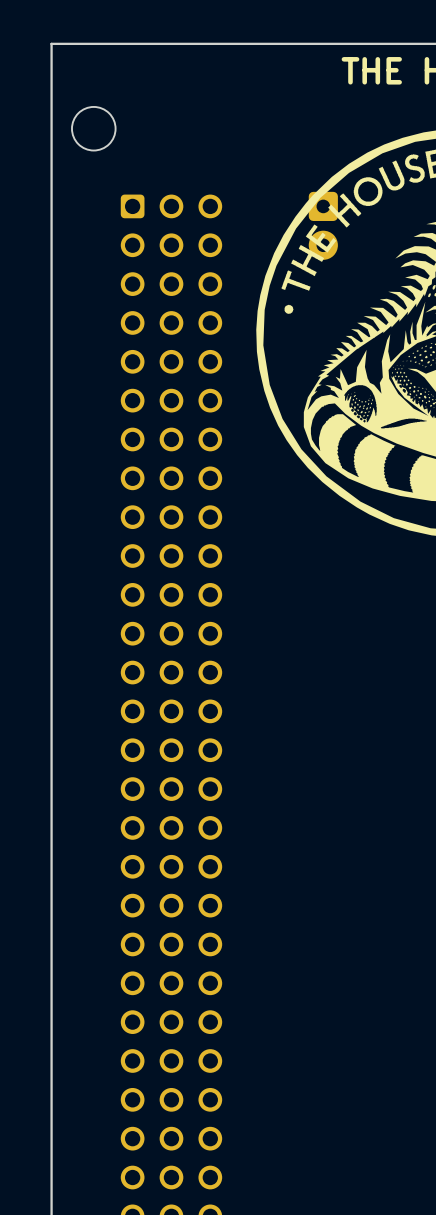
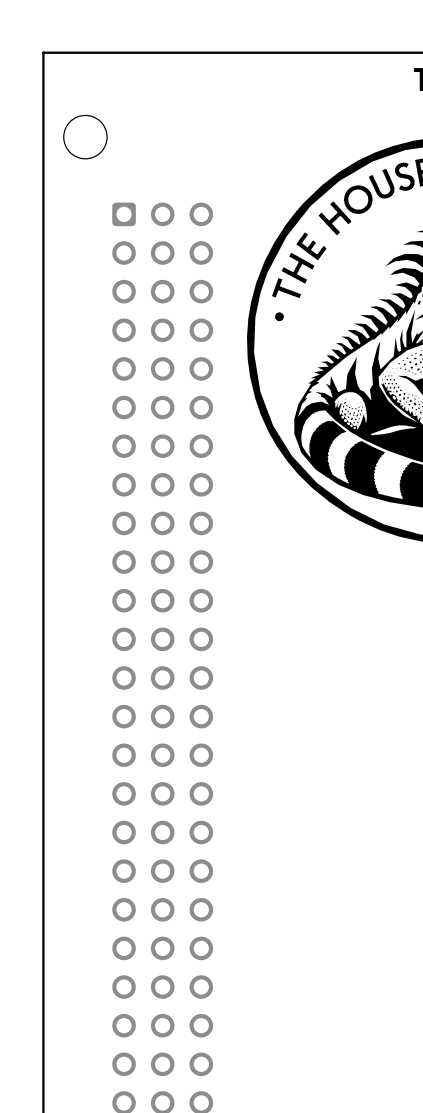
part: (323, 225) -> none

